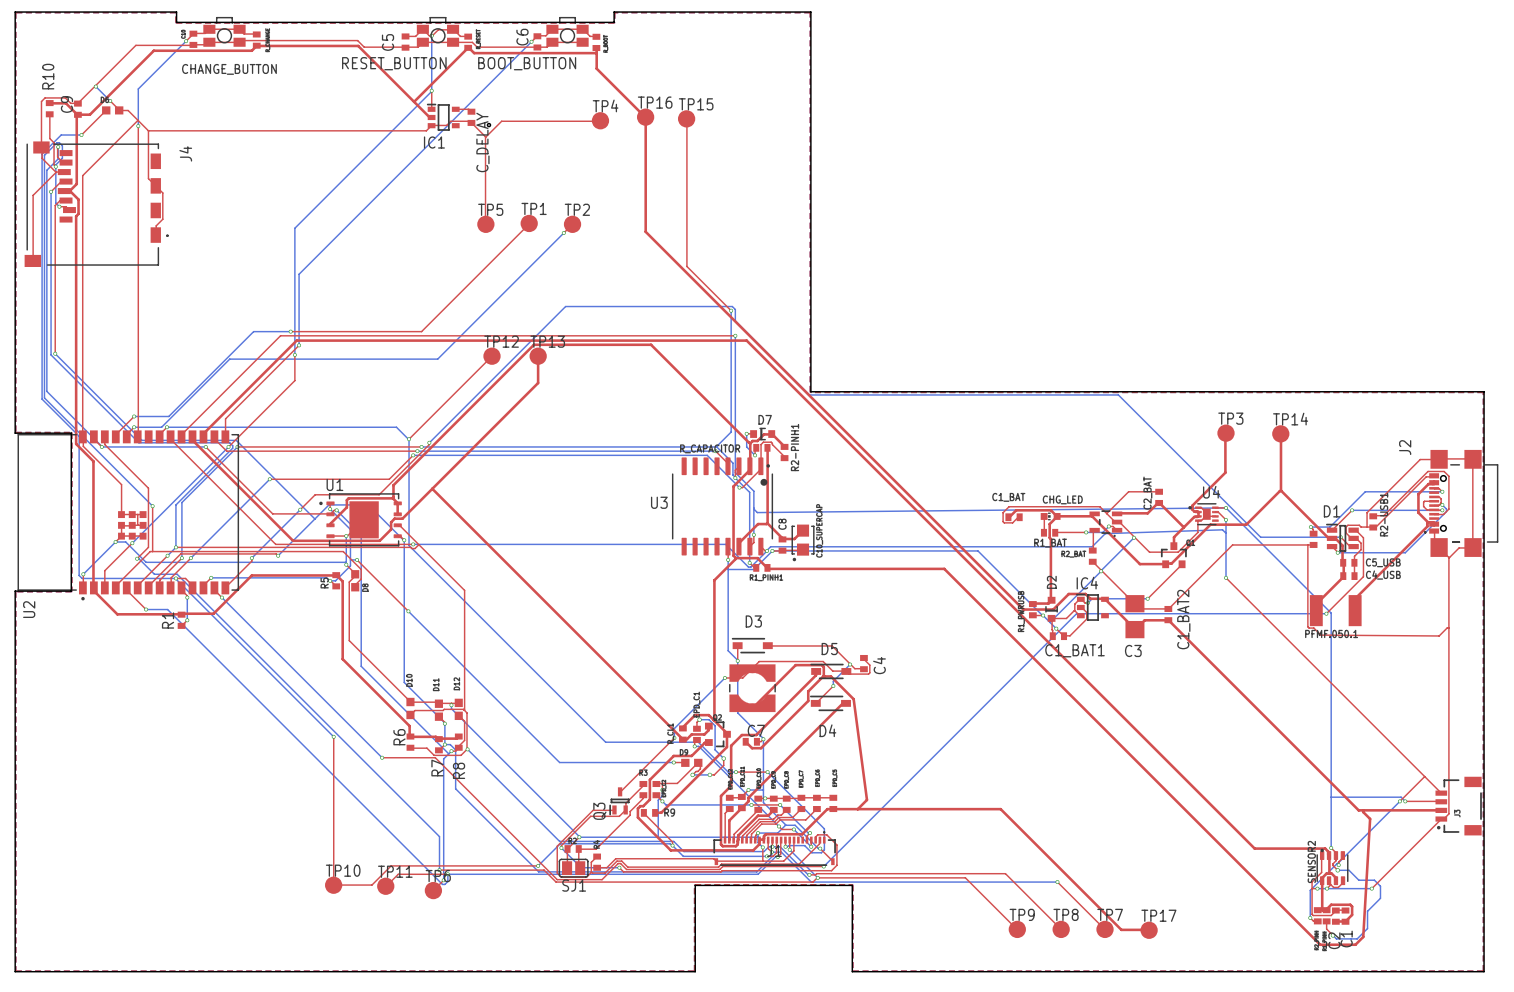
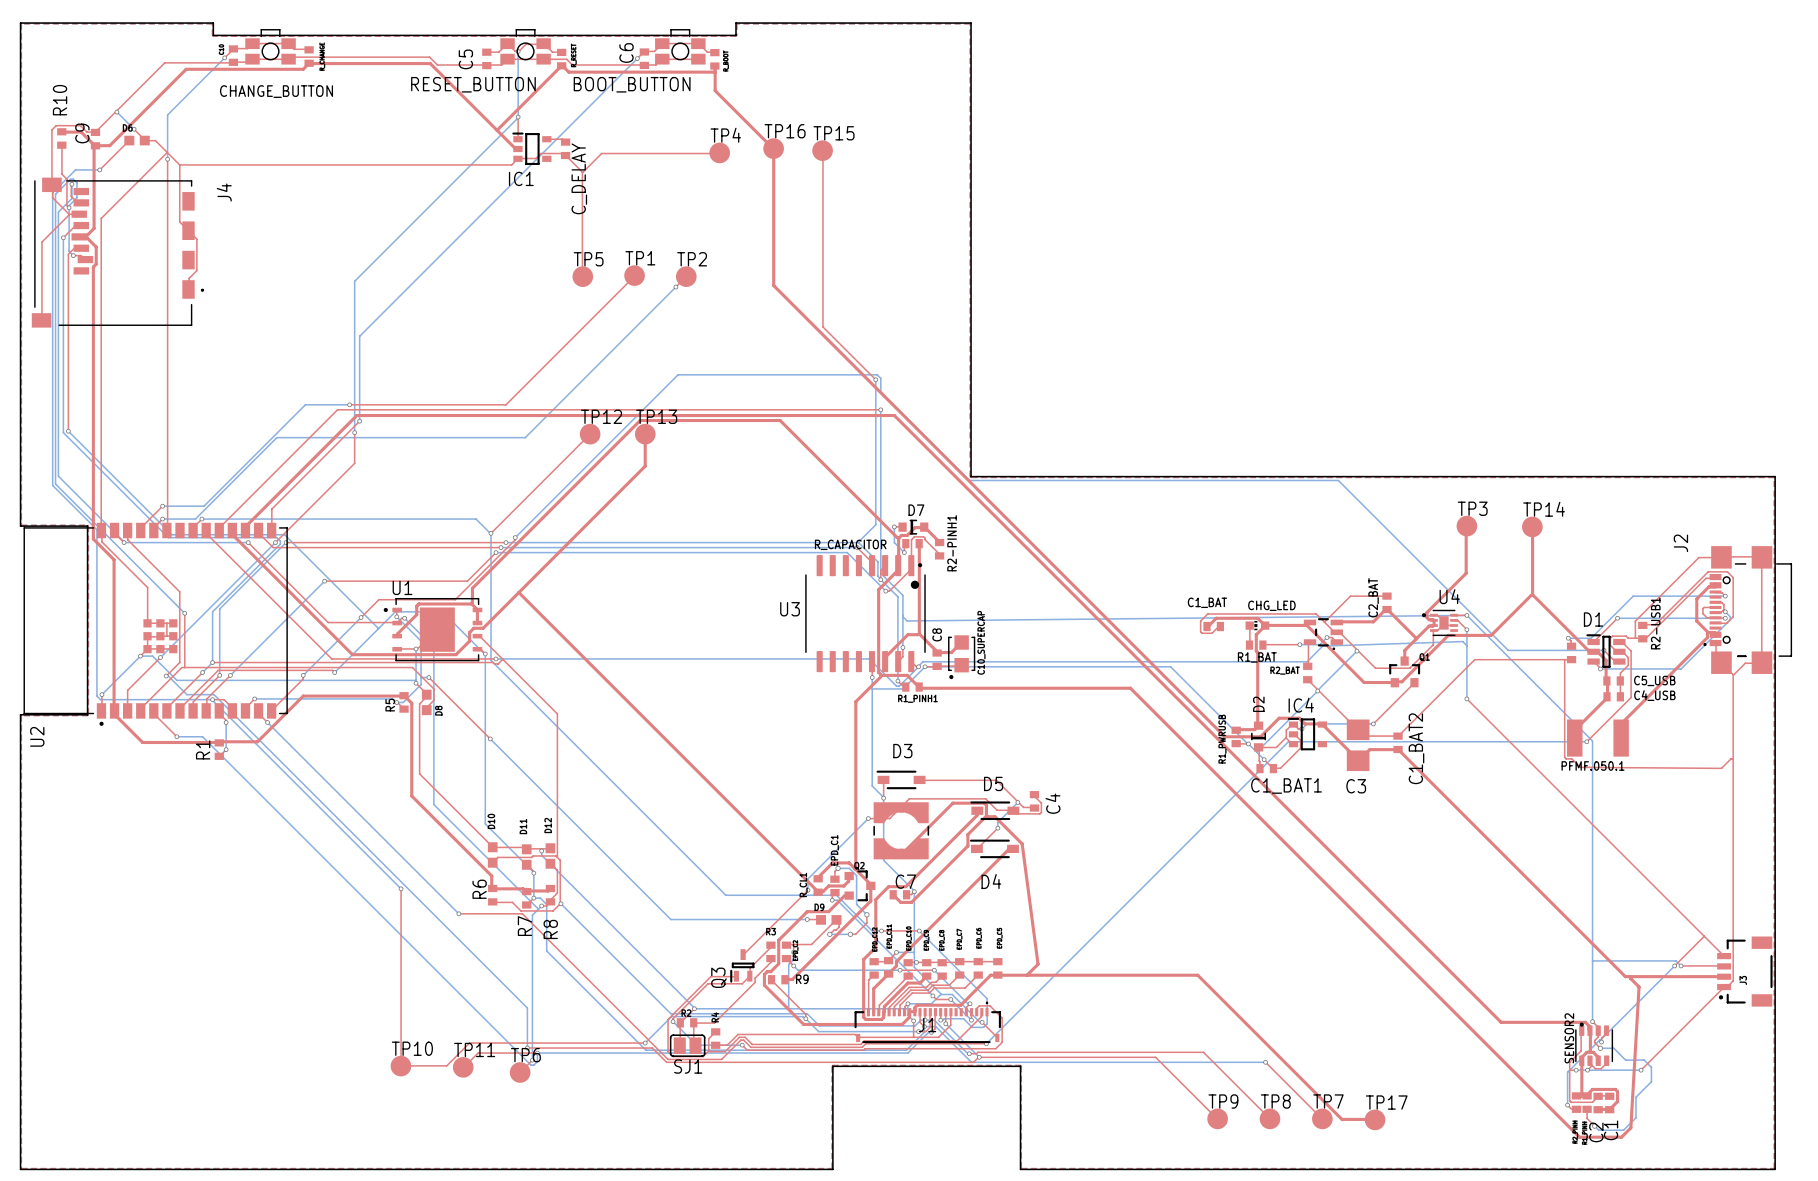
hole: (488, 125) -> none

